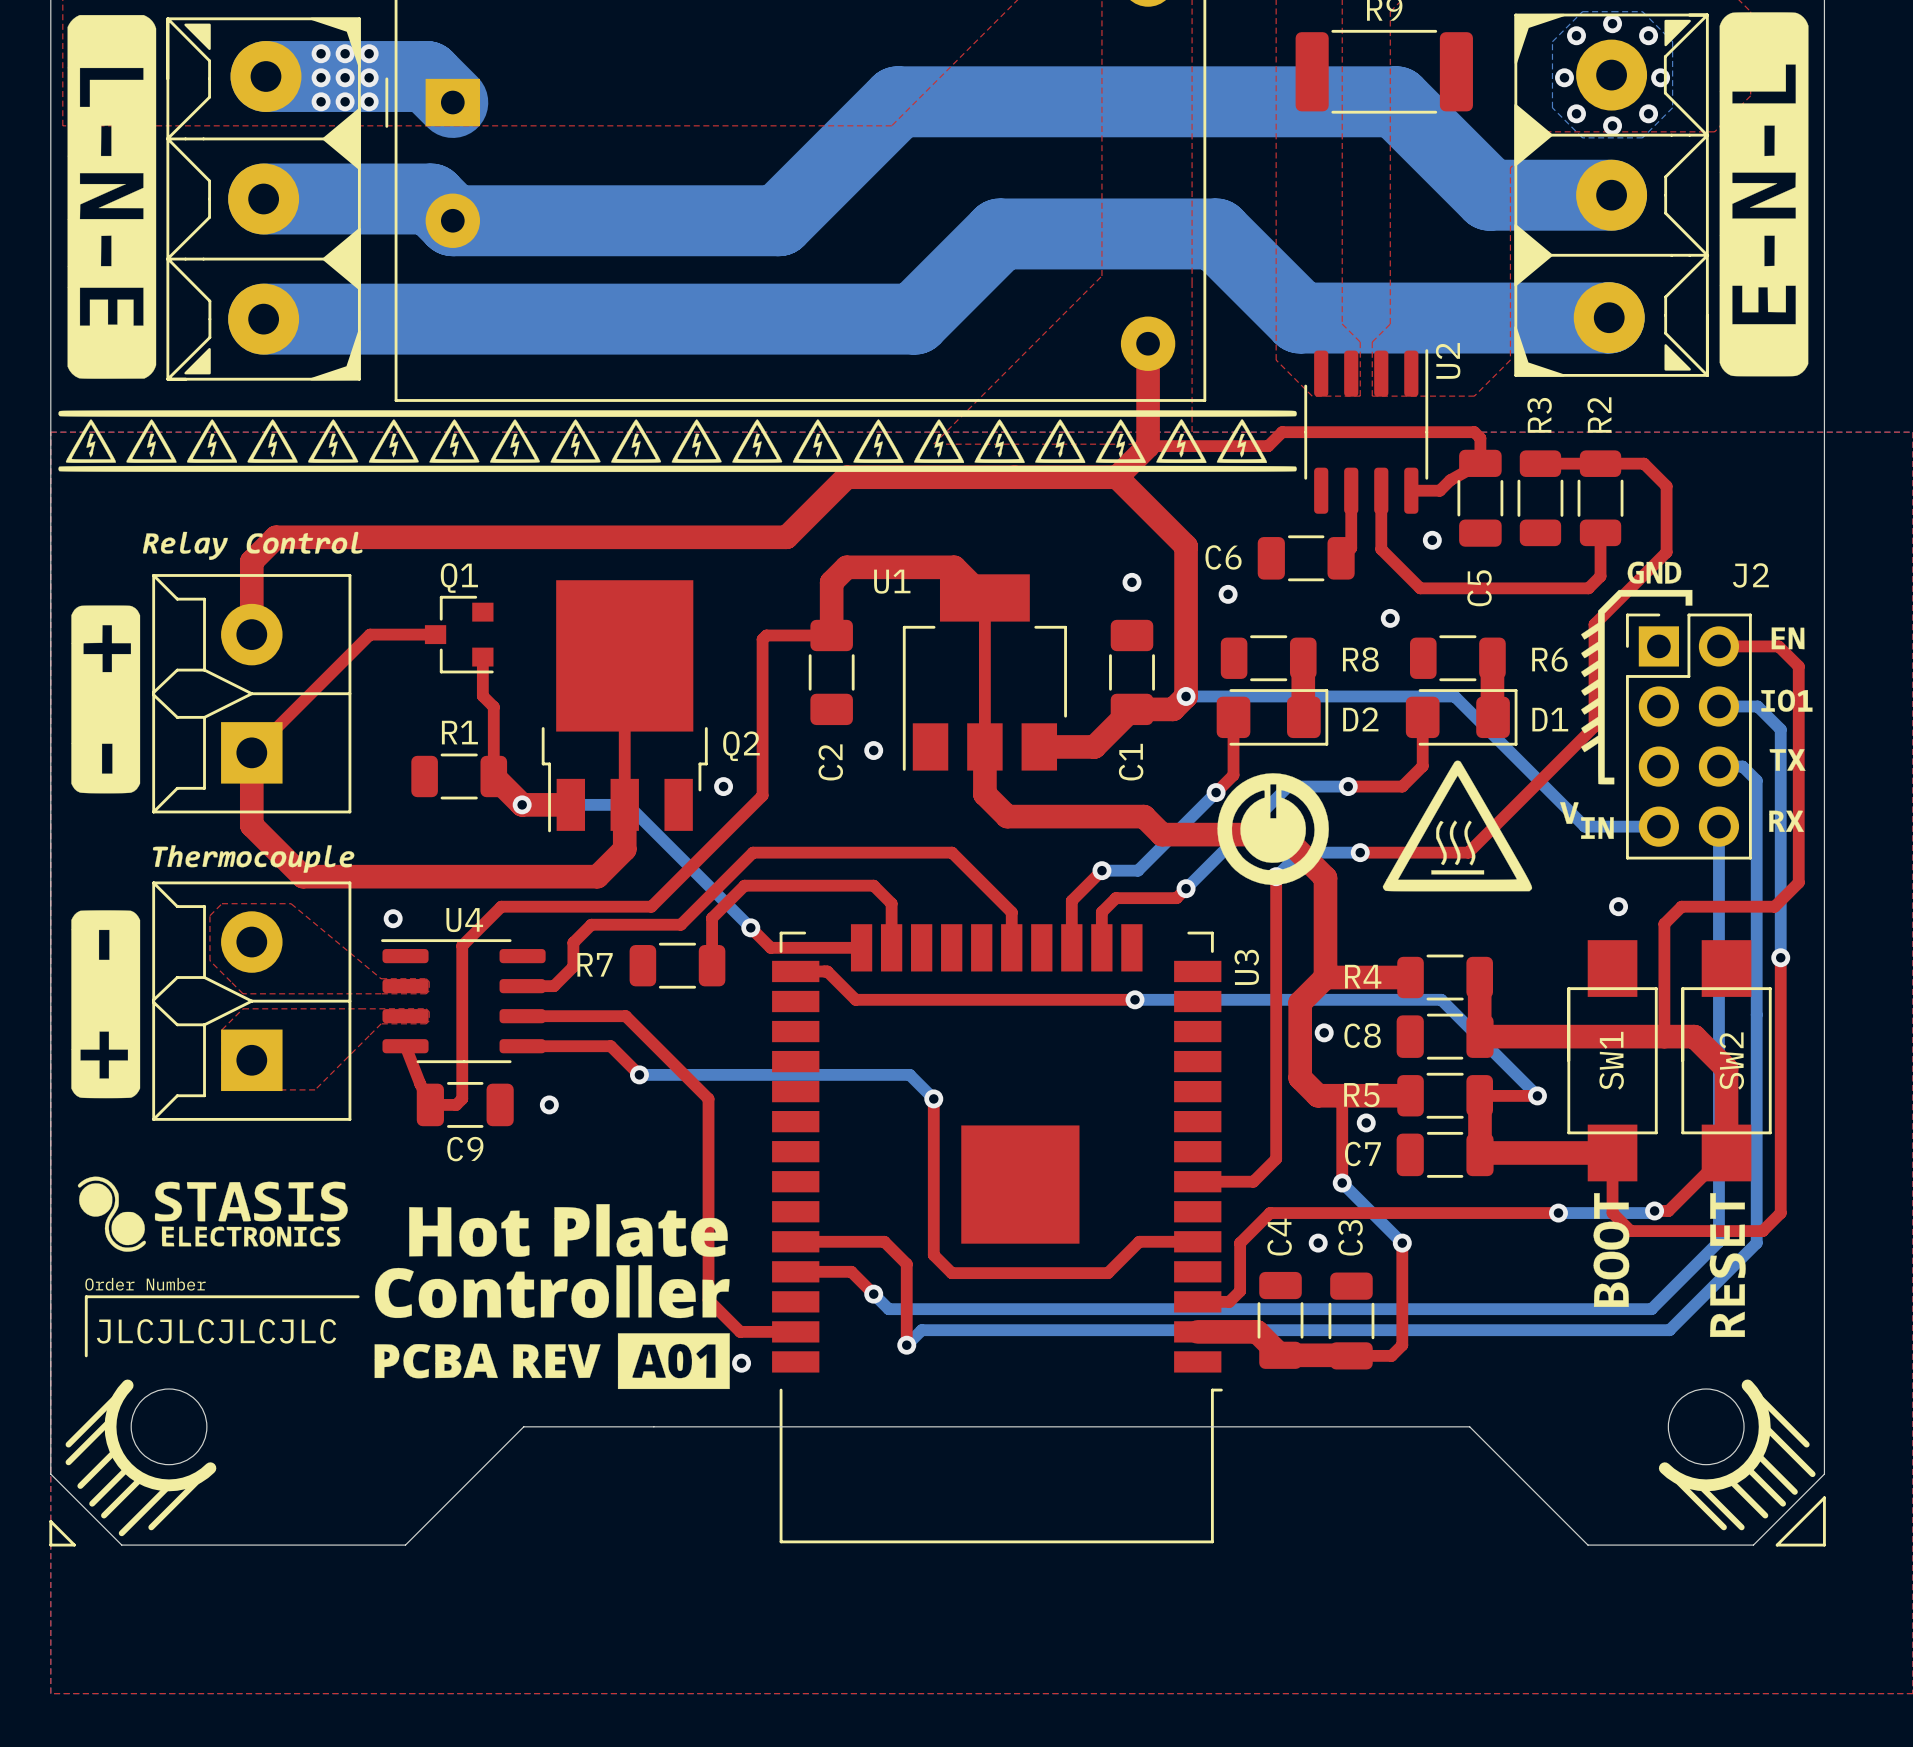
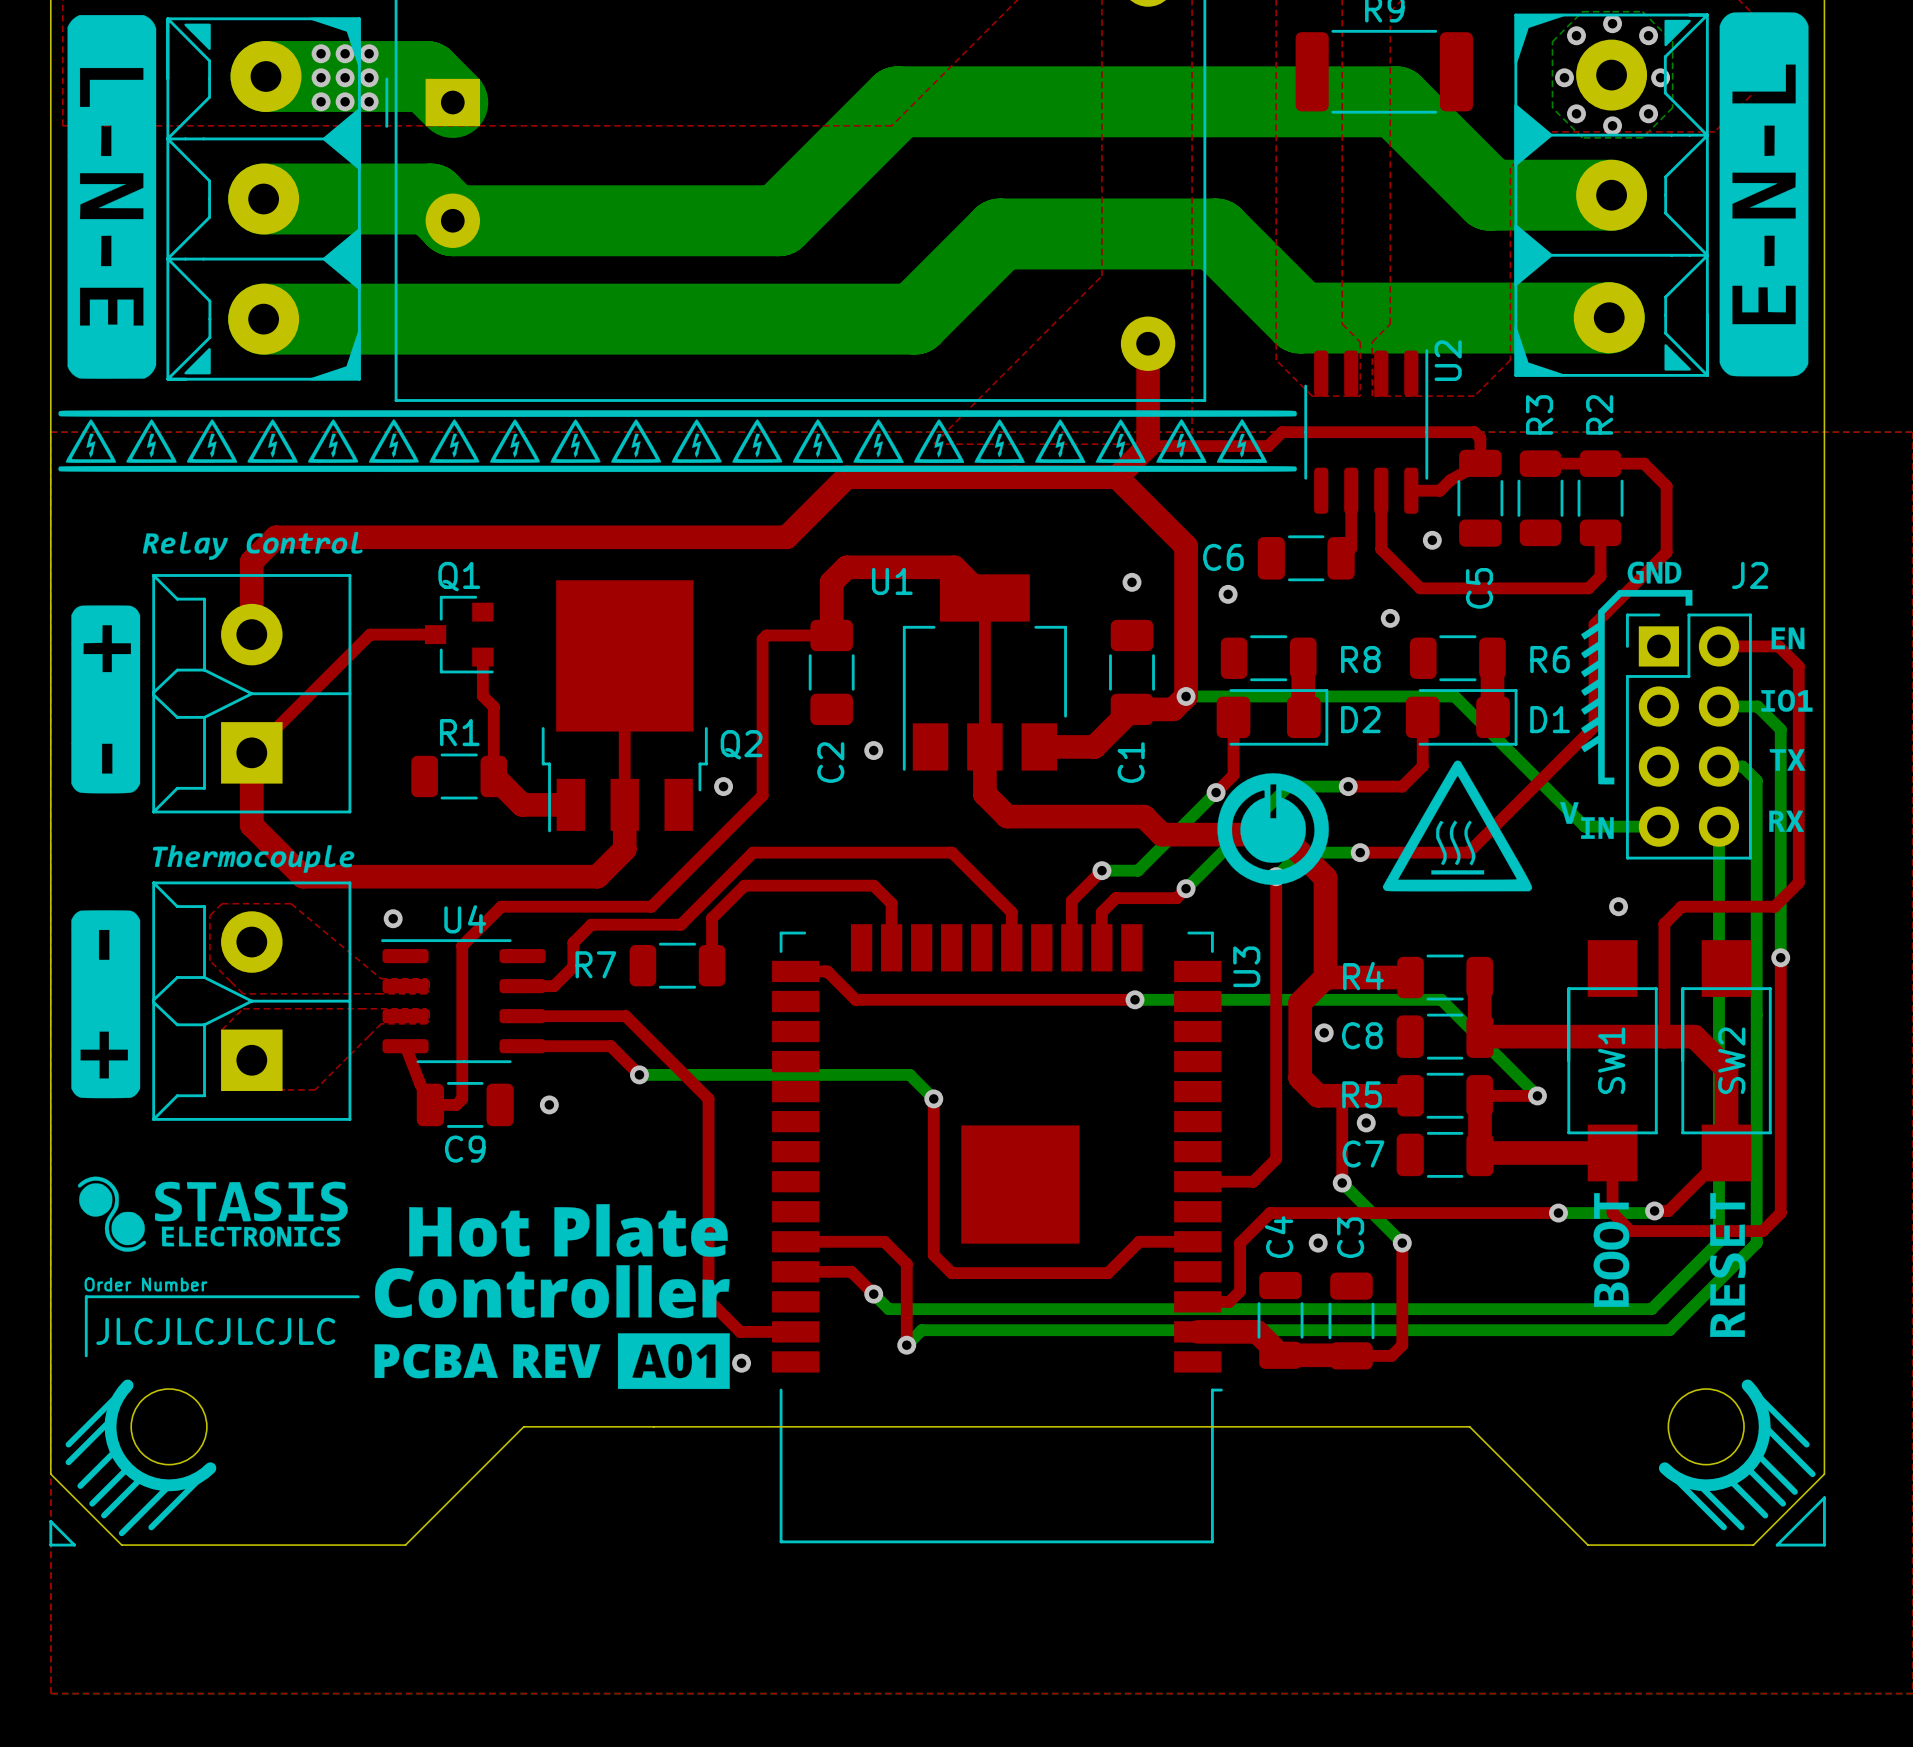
bottom track: (522, 804) (627, 804) (750, 927) -> none
via: (522, 804) -> none
top track: (750, 927) (770, 947) (861, 947) -> none
via: (750, 927) -> none

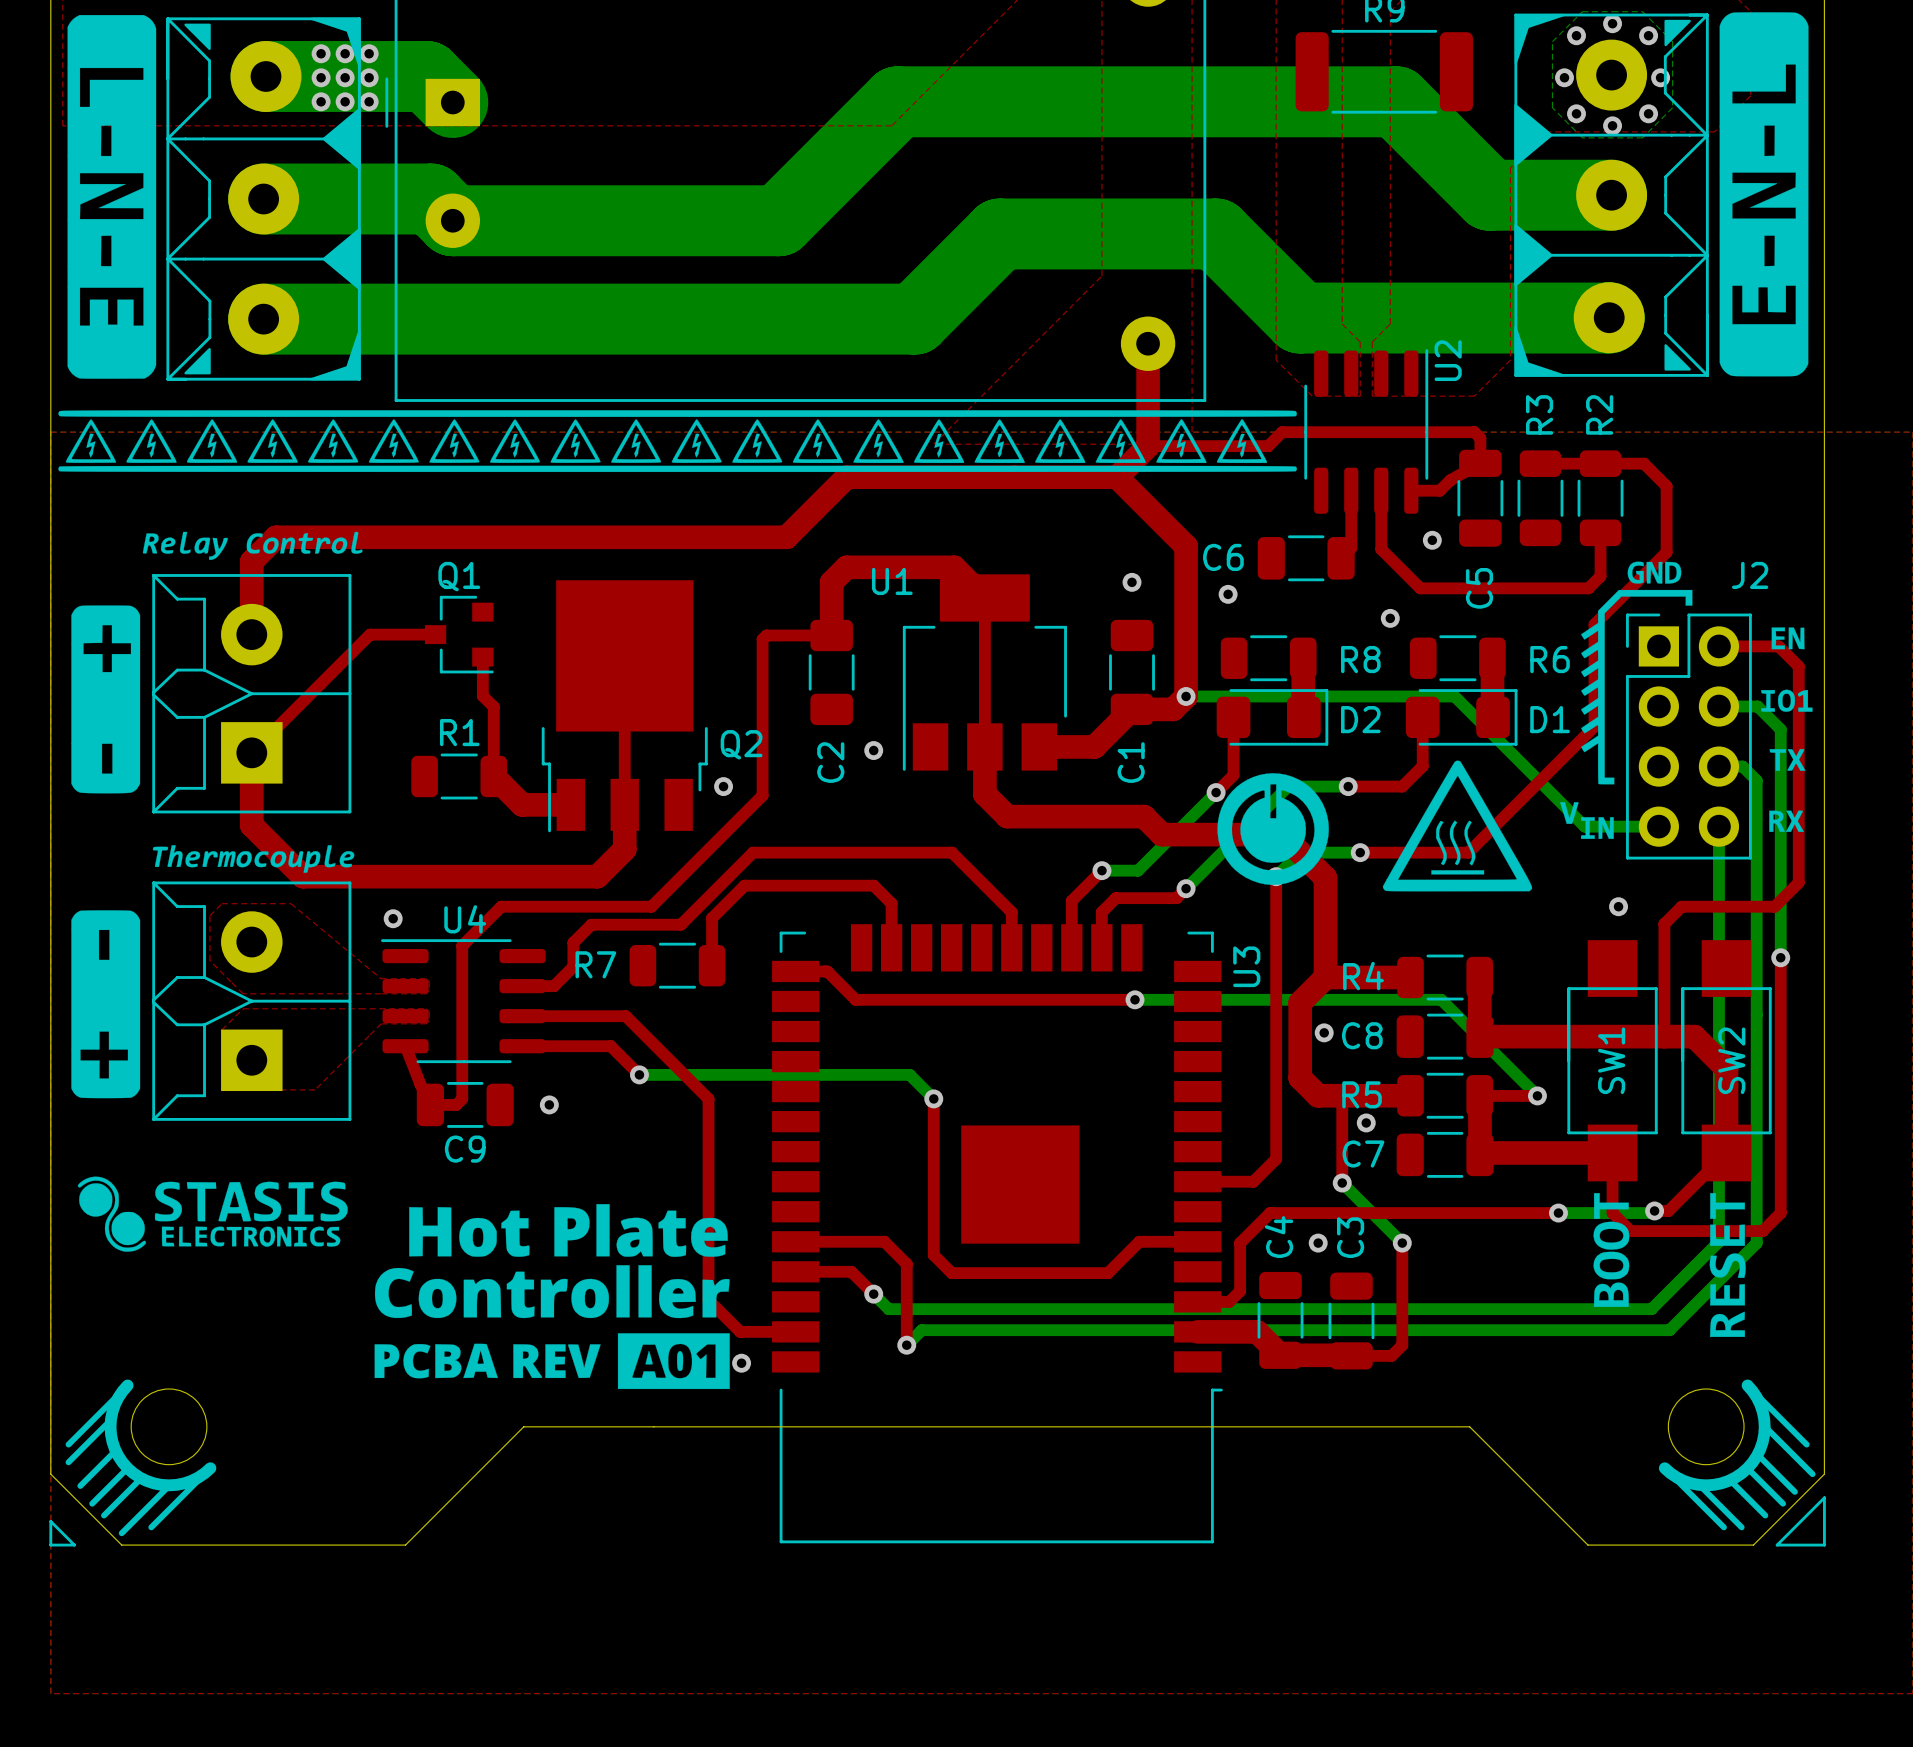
text: Order Number (145, 1284) -> none
line: (358, 1296) (86, 1296) (86, 1355) -> none
text: JLCJLCJLCJLC (215, 1331) -> none

